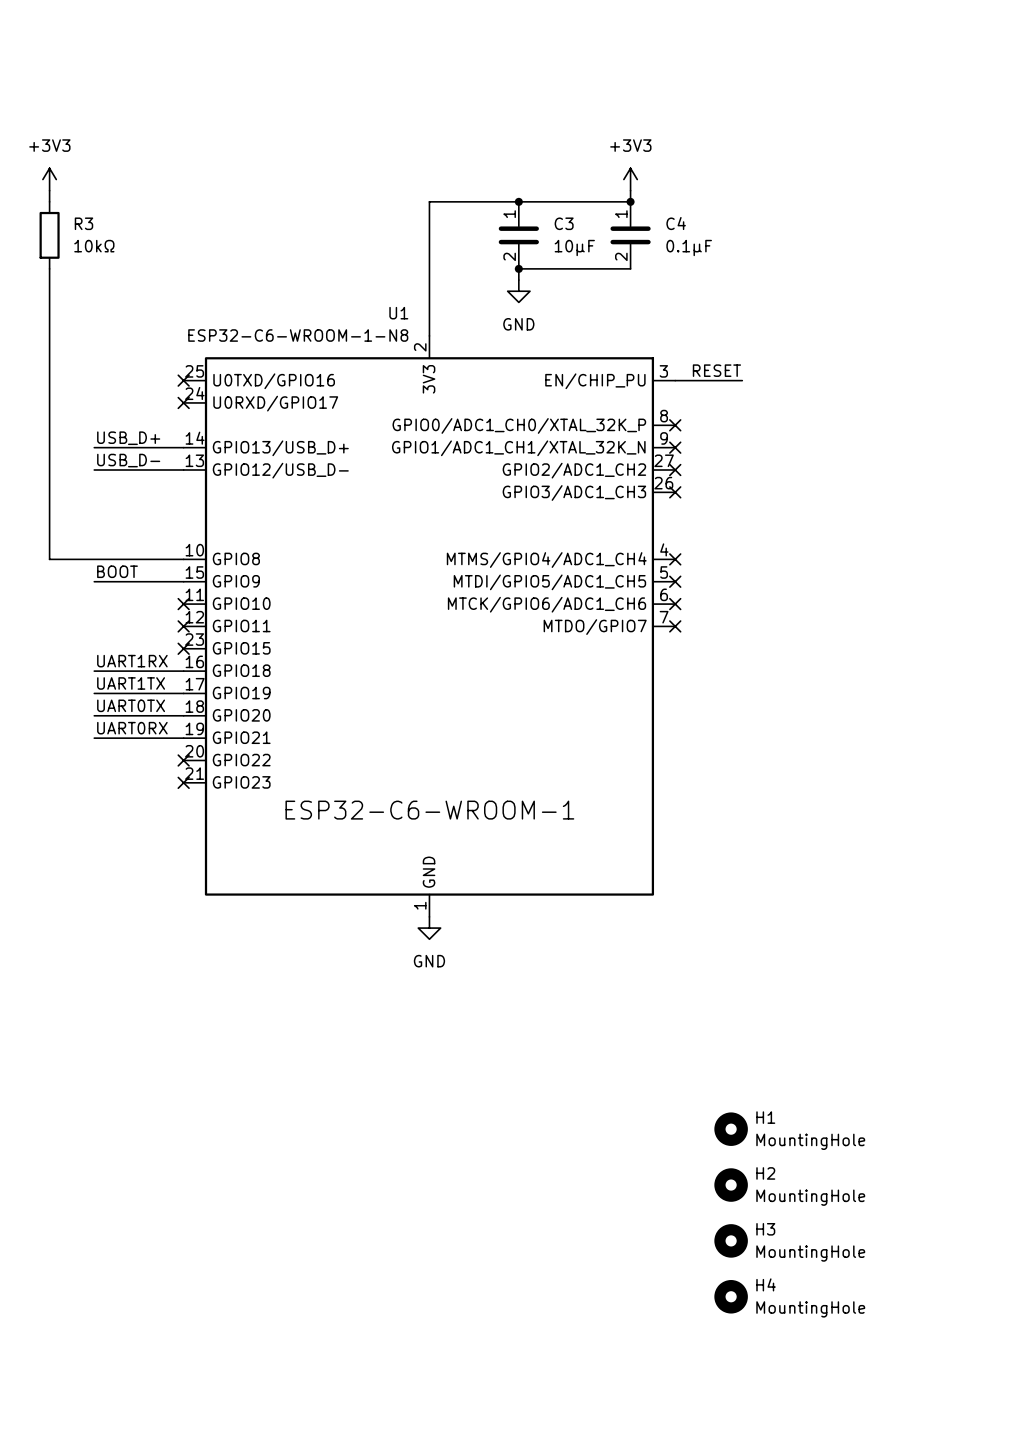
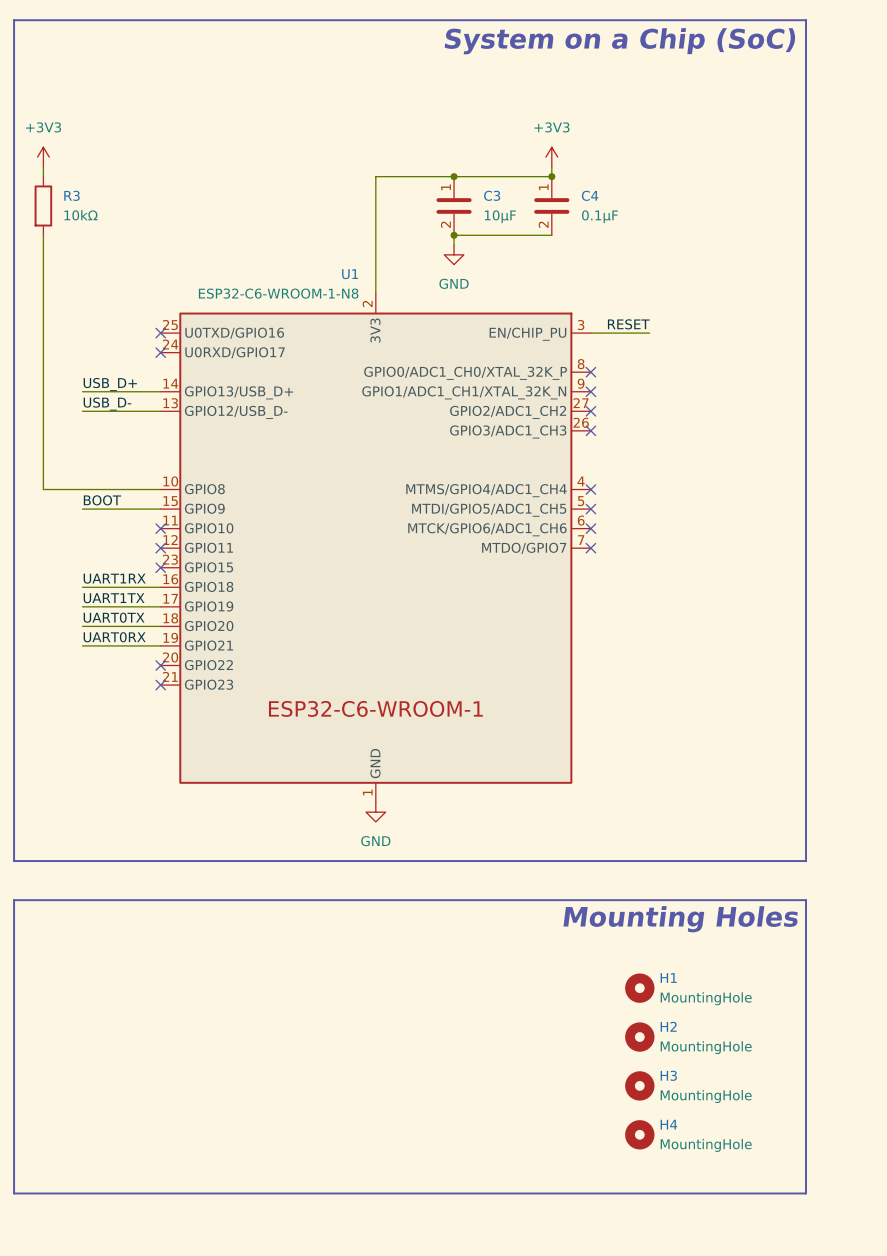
line: none -> (14, 20) (14, 861) (806, 861) (806, 20) (14, 20)
text: none -> System on a Chip (SoC) (619, 41)
line: none -> (14, 900) (806, 900) (806, 1193) (14, 1193) (14, 900)
text: none -> Mounting Holes (680, 919)

